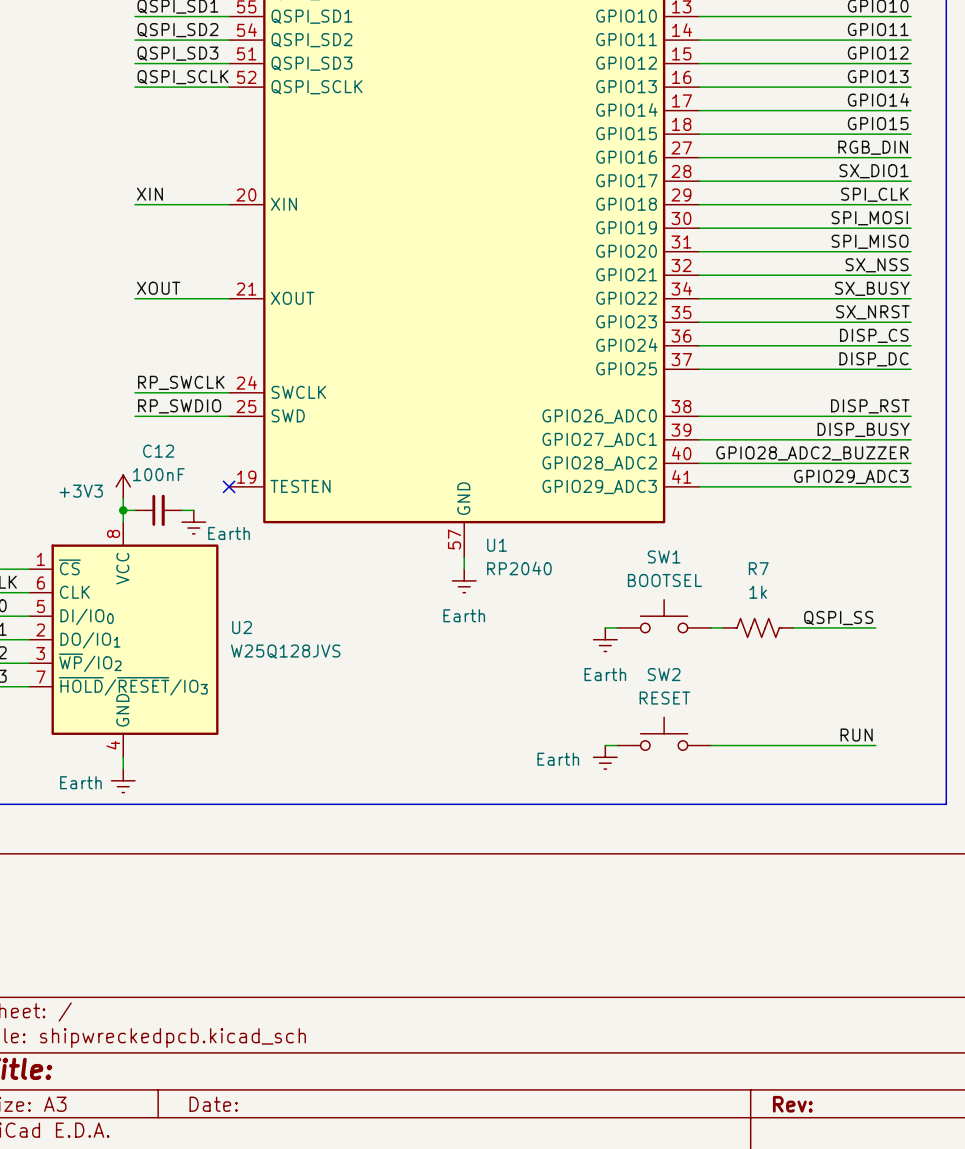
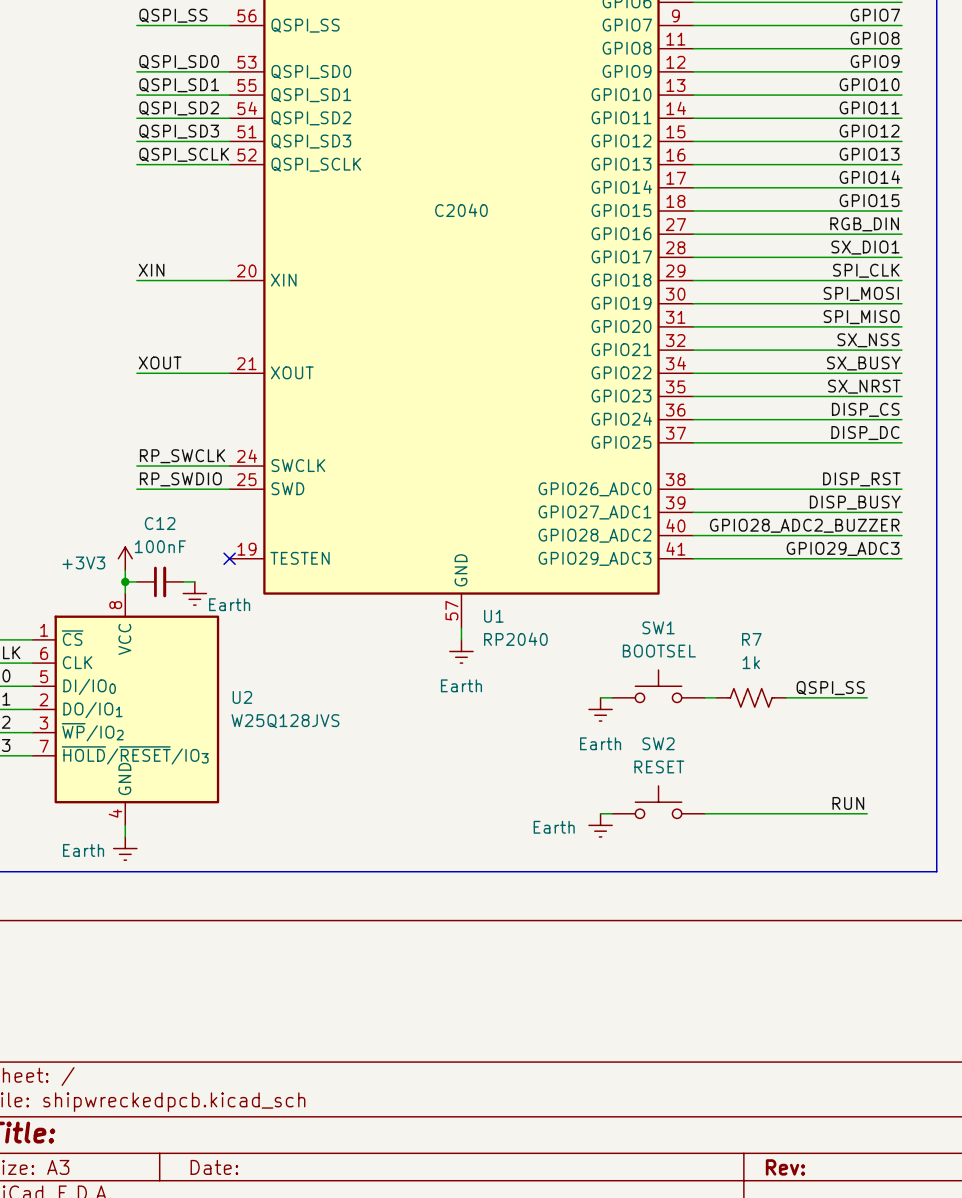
U1 text: none -> C2040 (461, 210)

